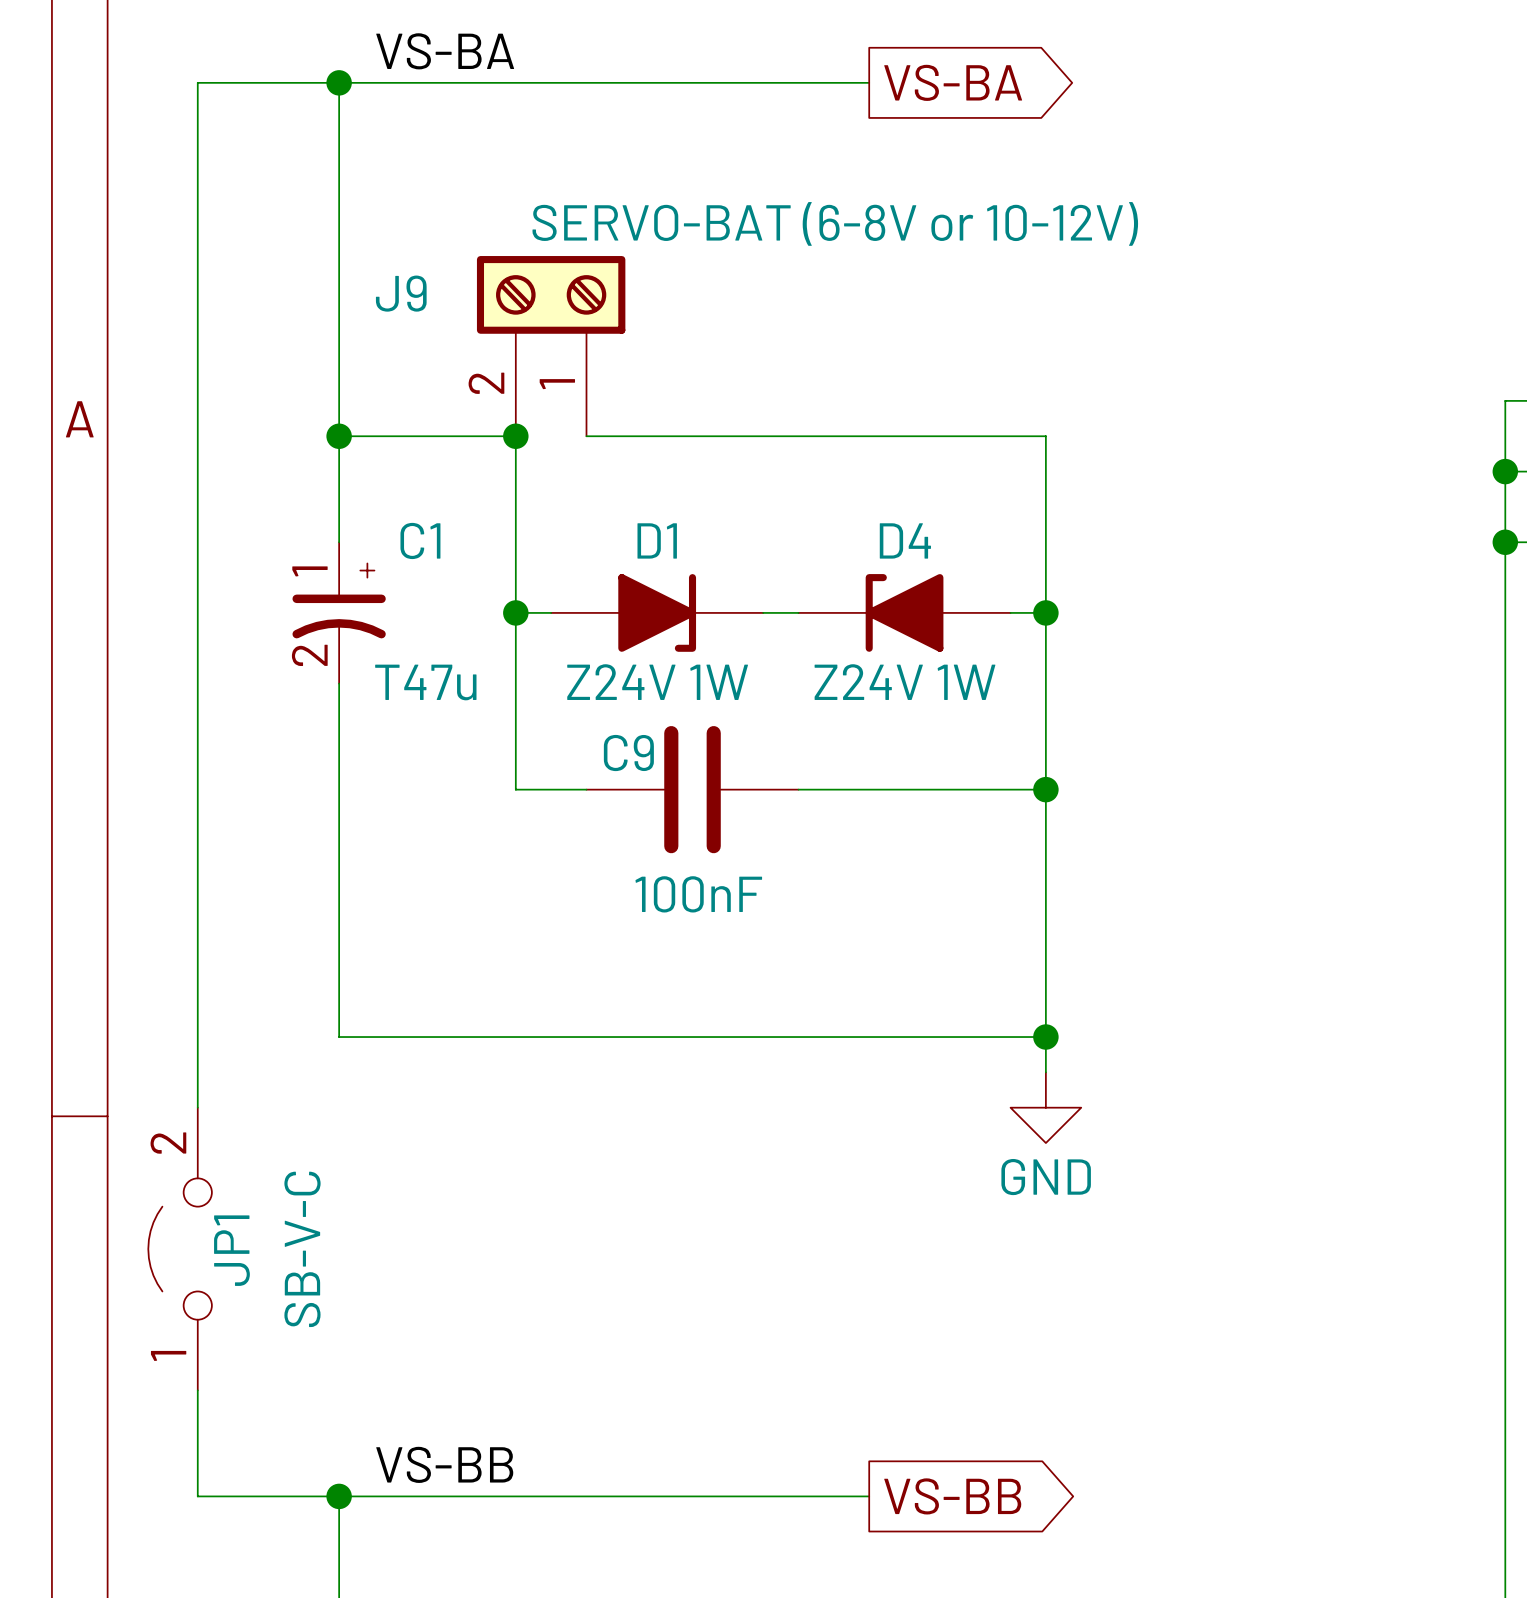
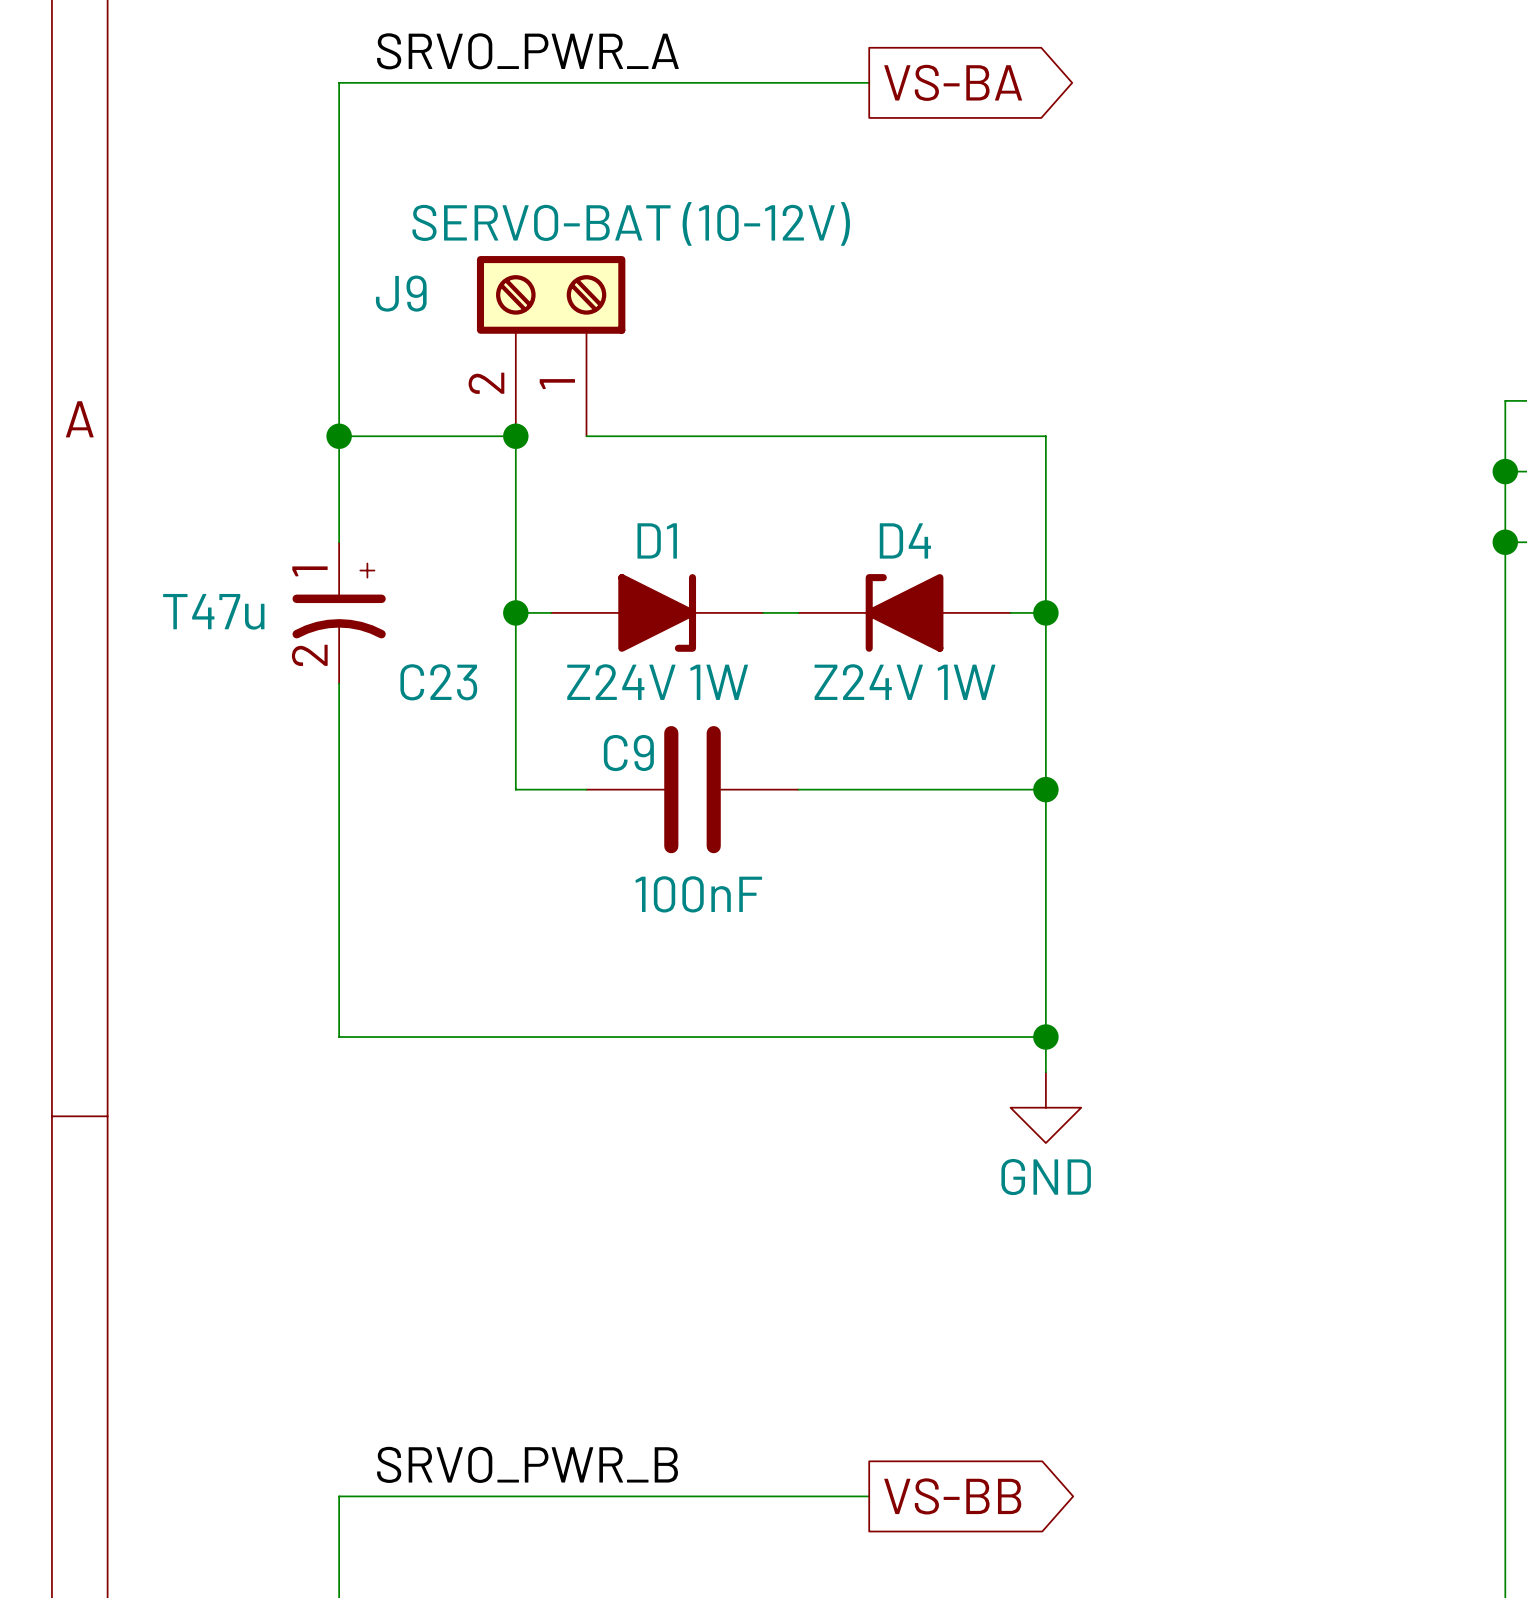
label: VS-BA (445, 51) -> SRVO_PWR_A (527, 51)
wire: (339, 82) (197, 82) (197, 1107) -> none
junction: (339, 82) -> none
J9 value: none -> SERVO-BAT (10-12V) (631, 223)
J9 text: SERVO-BAT (6-8V or 10-12V) (835, 223) -> none
C1 name: C1 (420, 540) -> C23 (438, 682)
C1 value position: T47u (425, 682) -> T47u (213, 611)
JP1: (180, 1249) -> none
wire: (197, 1390) (197, 1496) (339, 1496) -> none
label: VS-BB (444, 1464) -> SRVO_PWR_B (527, 1464)
junction: (339, 1496) -> none

